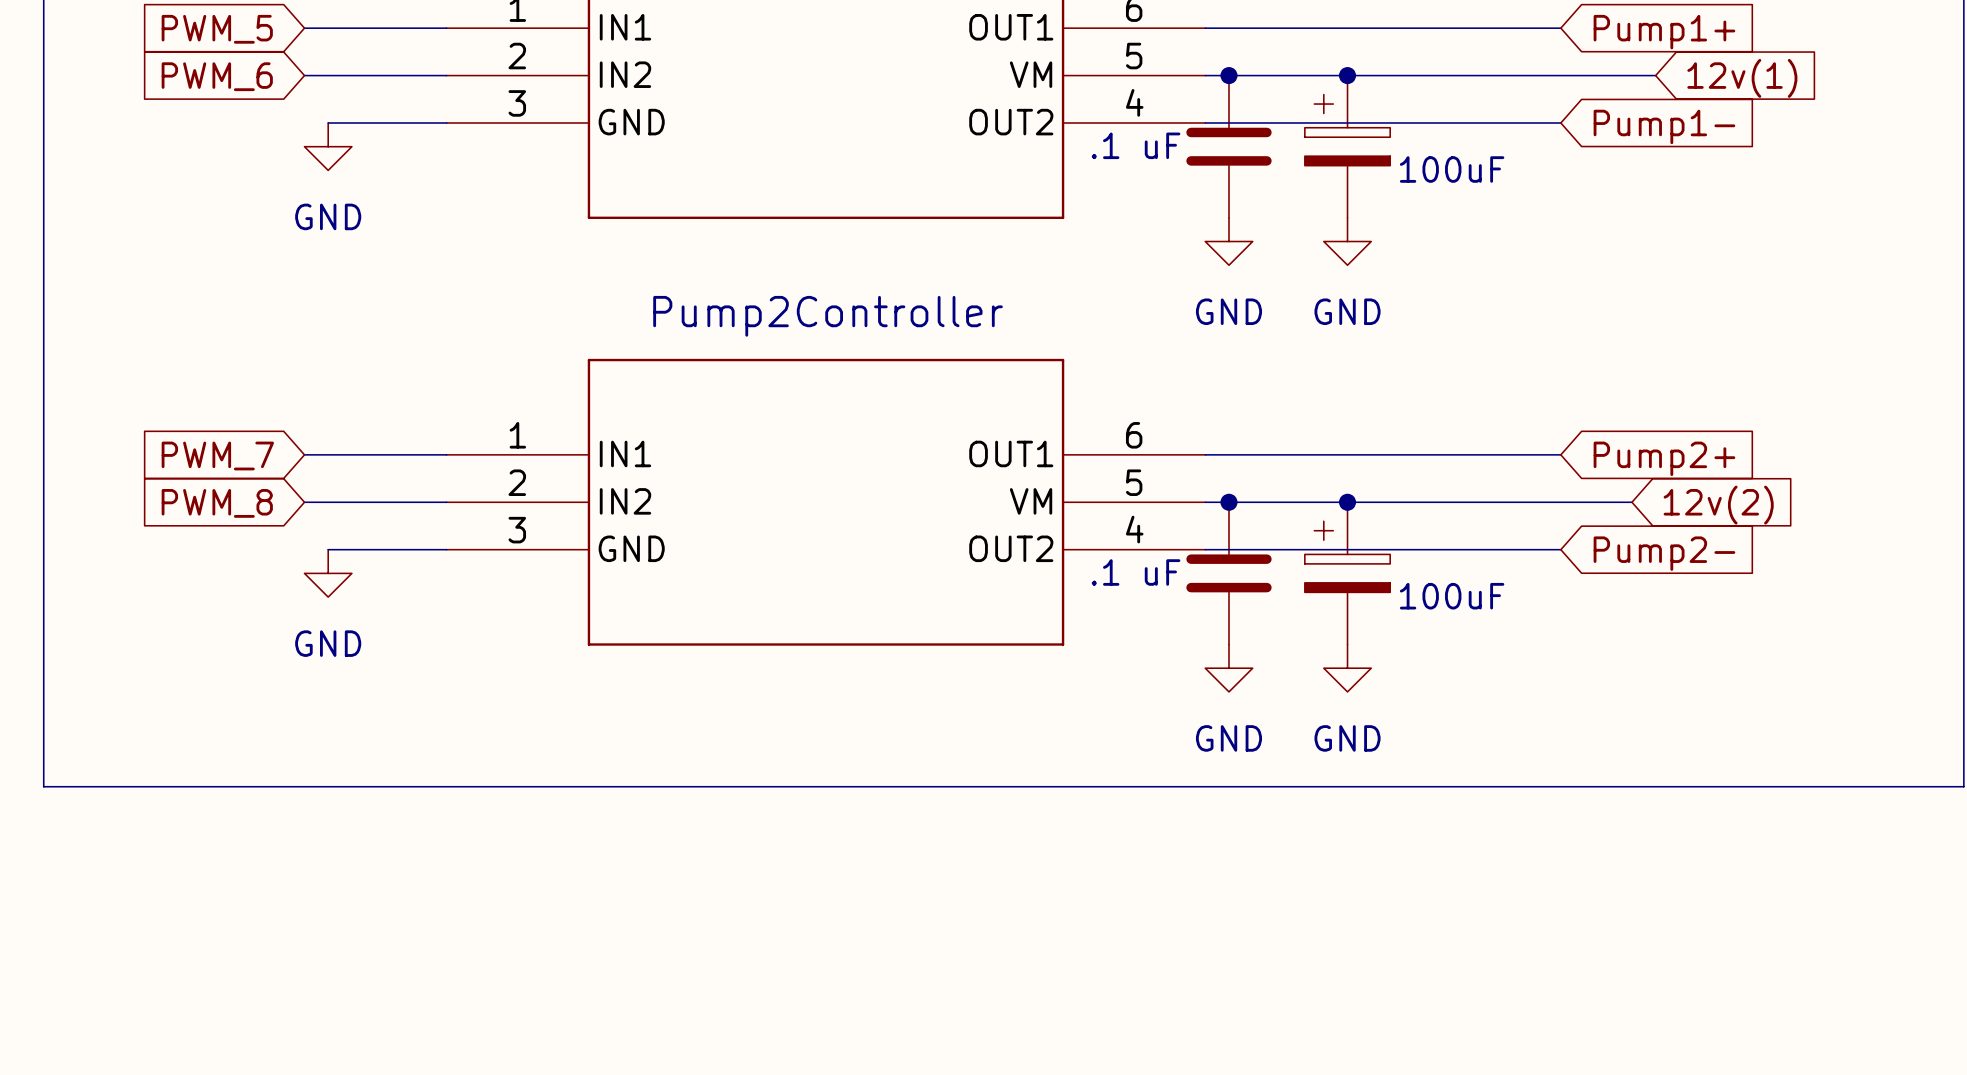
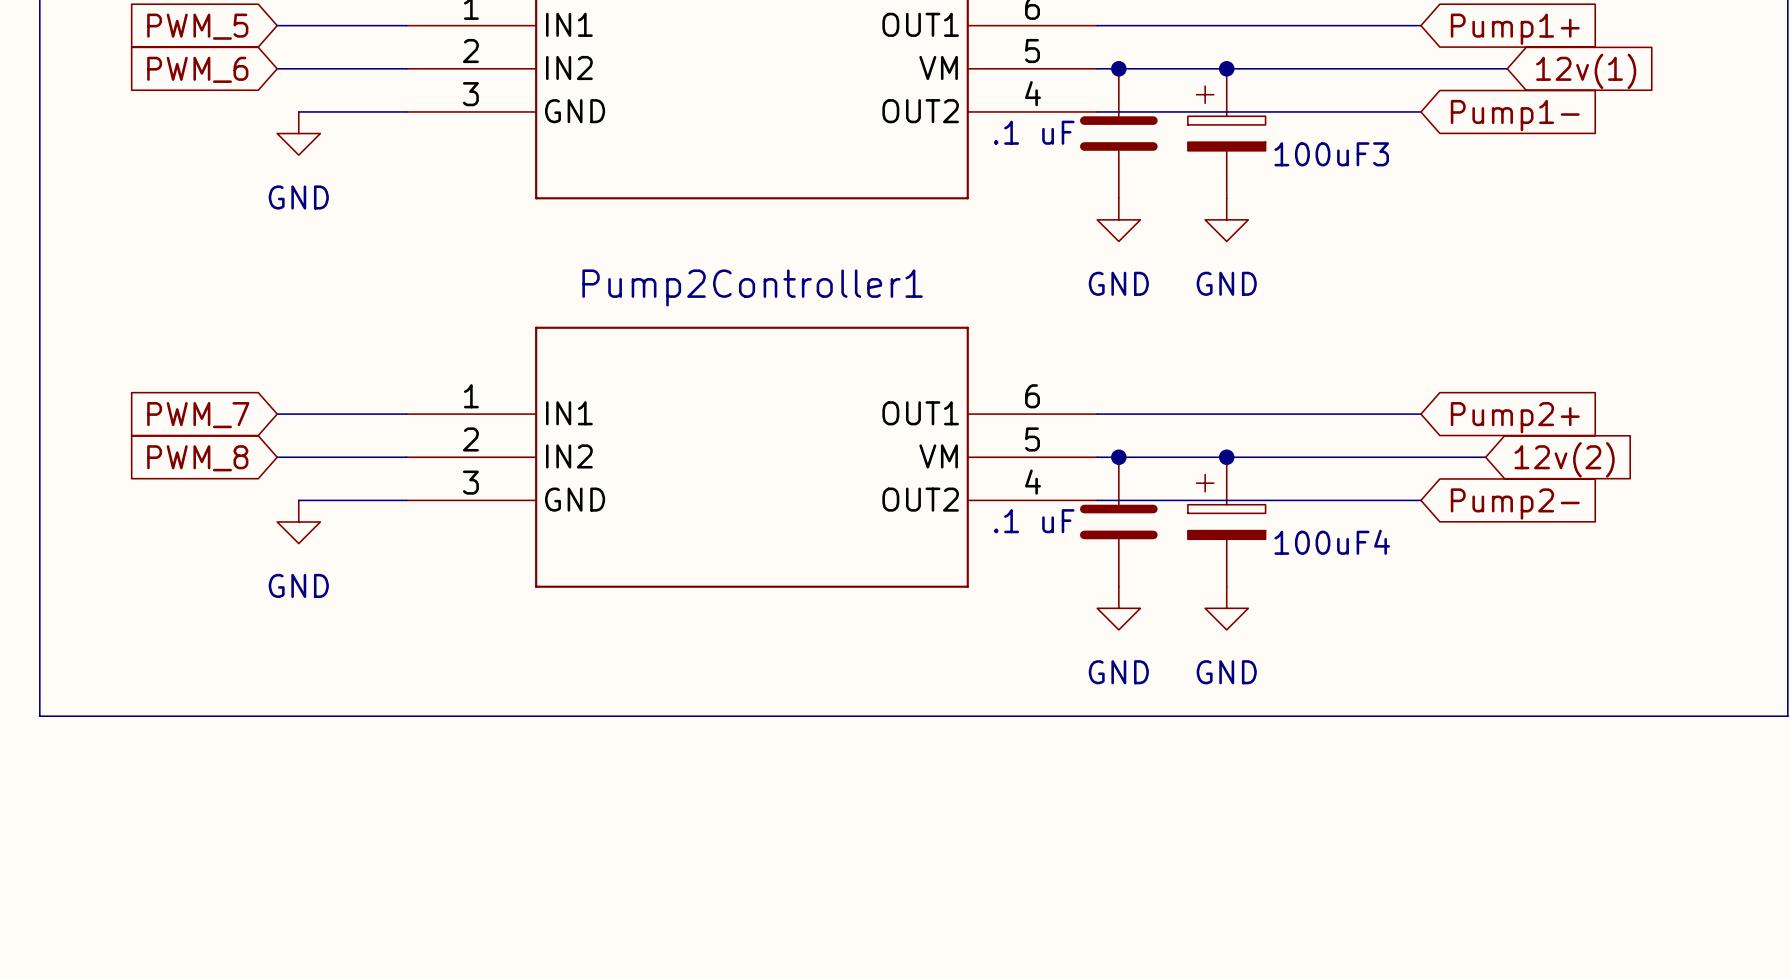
100uF name: 100uF (1452, 169) -> 100uF3 (1331, 154)
Pump2Controller name: Pump2Controller (828, 316) -> Pump2Controller1 (752, 287)
100uF name: 100uF (1452, 596) -> 100uF4 (1332, 542)

